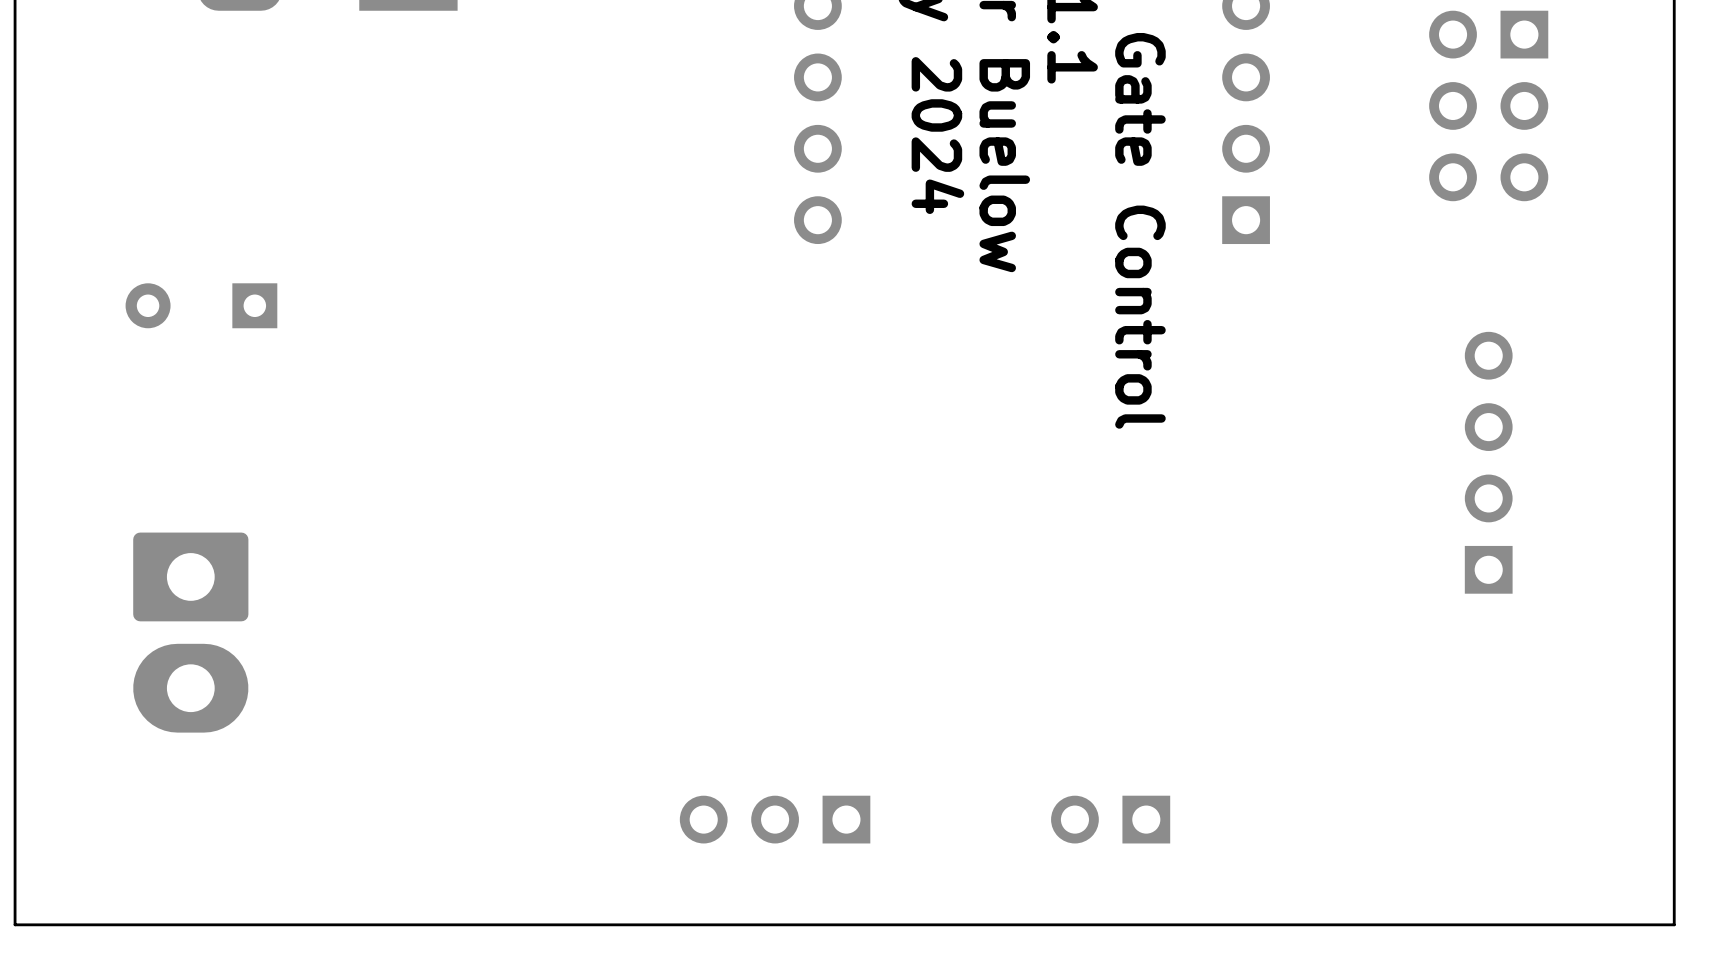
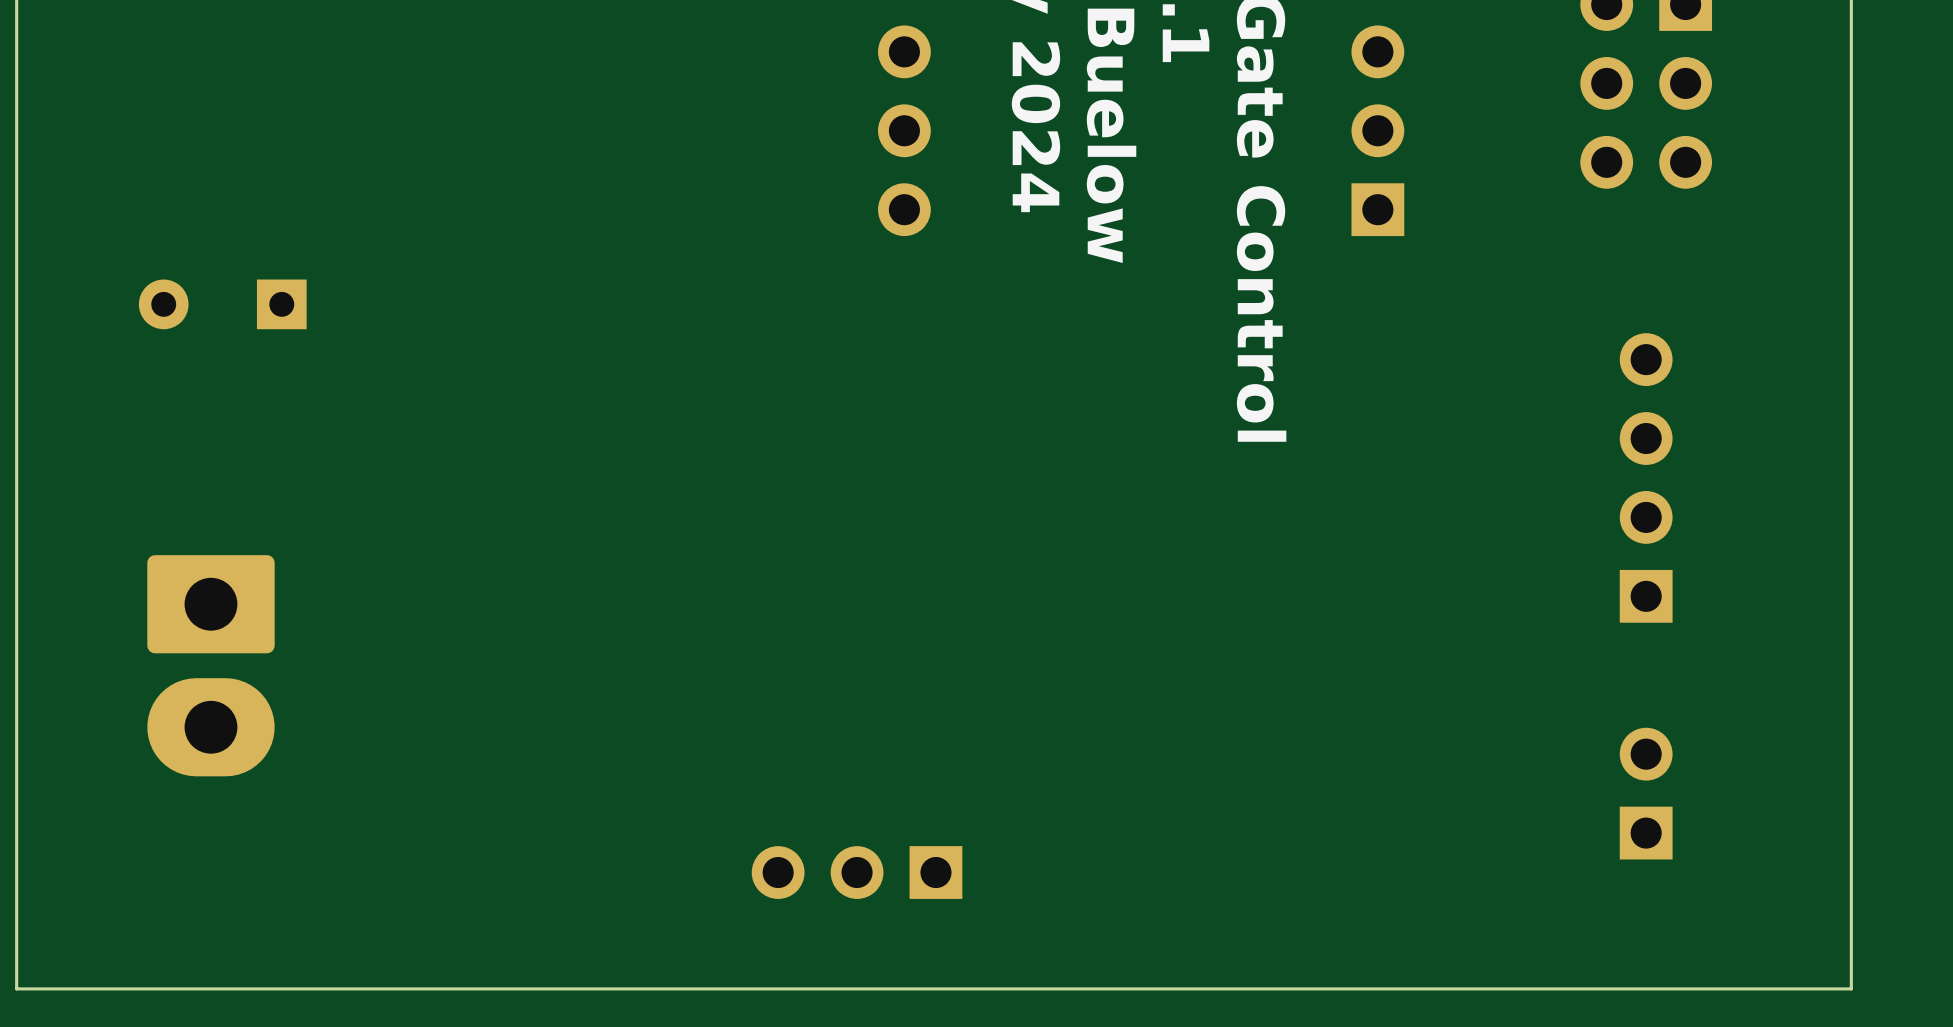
part rotation: 0° (1110, 819) -> 90° clockwise (1646, 793)
part position: (1110, 819) -> (1646, 793)

